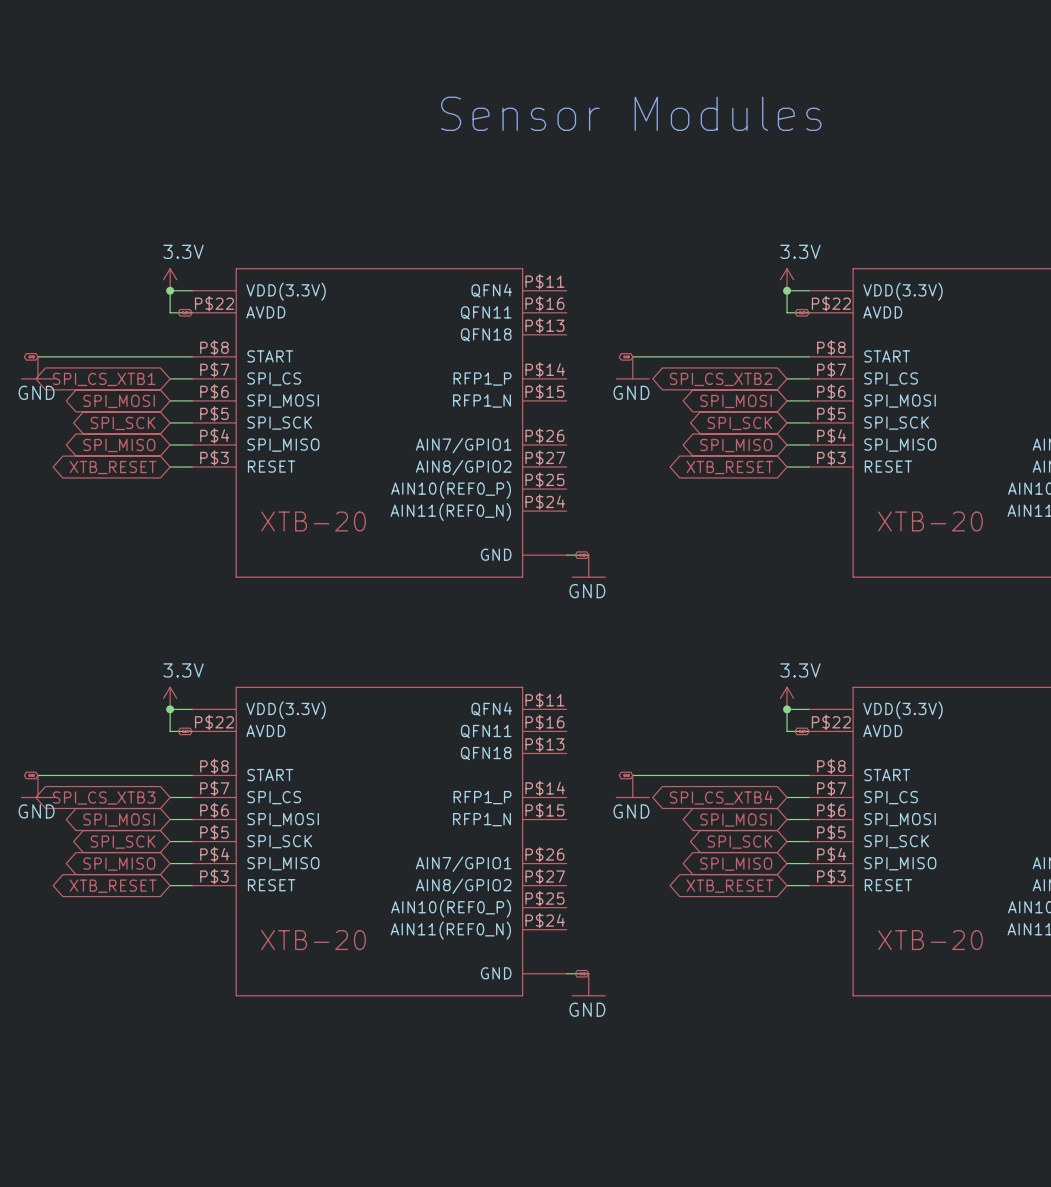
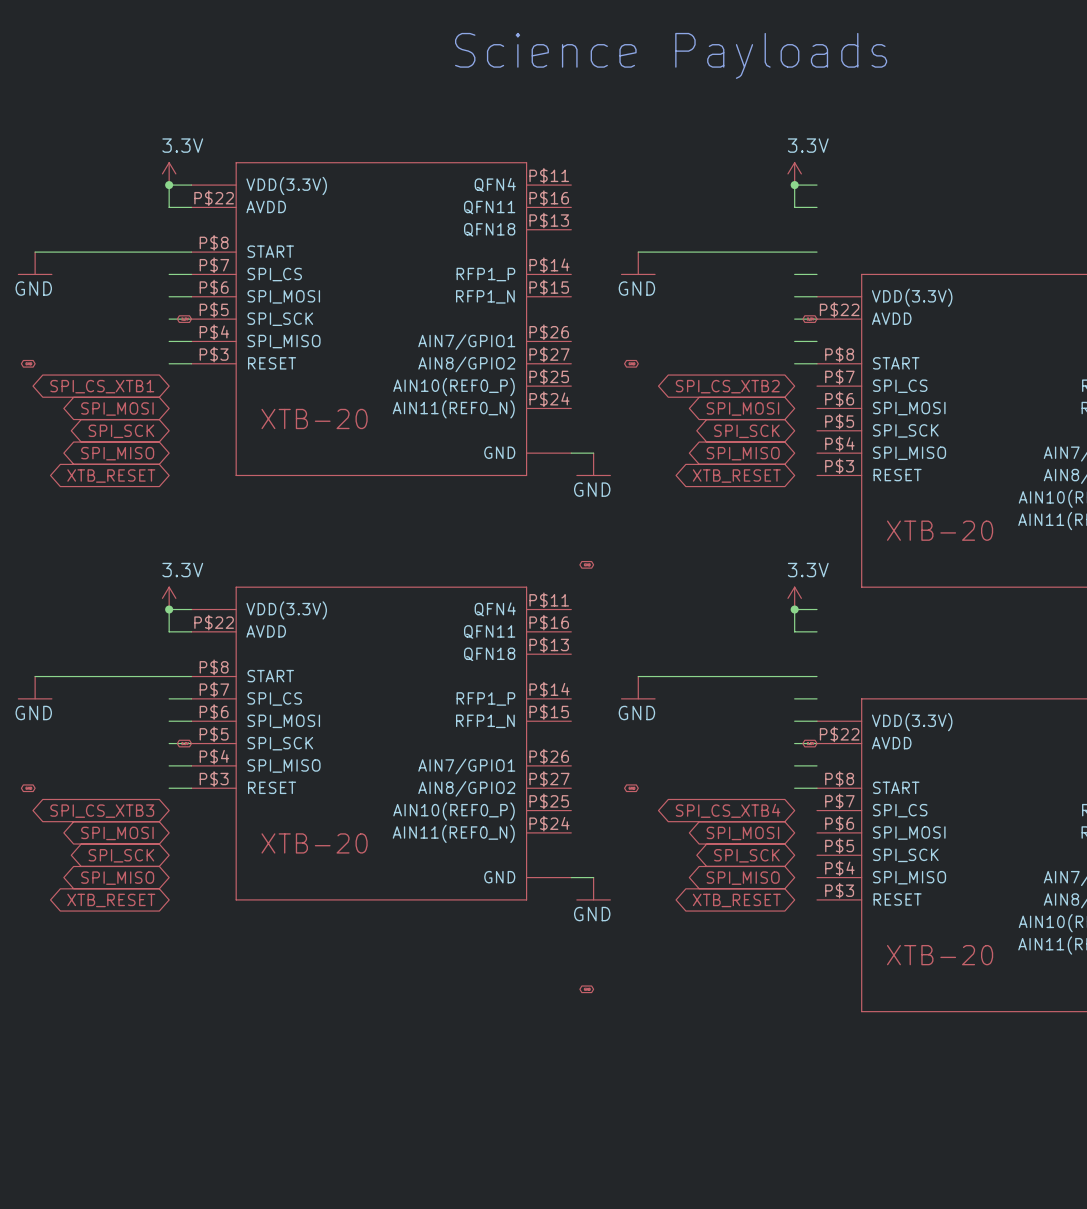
text: none -> Science Payloads (671, 55)
text: Sensor Modules (631, 113) -> none
junction: none -> (169, 185)
wire: none -> (191, 185) (169, 185) (169, 207) (191, 207)
junction: none -> (794, 185)
wire: none -> (817, 185) (794, 185) (794, 207) (817, 207)
wire: none -> (35, 252) (191, 252)
wire: none -> (638, 252) (817, 252)
power symbol: none -> GND (638, 263)
power symbol position: 3.3V (170, 279) -> 3.3V (169, 173)
power symbol position: 3.3V (787, 279) -> 3.3V (794, 173)
wire: (170, 290) (170, 312) -> none
junction: (170, 290) -> none
wire: (787, 290) (787, 312) -> none
junction: (787, 290) -> none
wire: (37, 356) (170, 356) -> none
wire: (632, 356) (787, 356) -> none
power symbol position: GND (37, 367) -> GND (35, 263)
power symbol: GND (632, 367) -> none
wire: (170, 378) (192, 378) -> (169, 274) (191, 274)
wire: (787, 378) (809, 378) -> (794, 274) (817, 274)
wire: (170, 400) (192, 400) -> none
wire: (787, 400) (809, 400) -> none
wire: (170, 422) (192, 422) -> none
part position: (379, 422) -> (381, 319)
wire: (787, 422) (809, 422) -> none
wire: (170, 444) (192, 444) -> (169, 341) (191, 341)
wire: (787, 444) (809, 444) -> (794, 341) (817, 341)
power symbol: none -> GND (593, 464)
wire: (170, 467) (192, 467) -> none
wire: (787, 467) (809, 467) -> none
wire: (566, 555) (588, 555) -> (571, 453) (593, 453)
power symbol: GND (588, 566) -> none
junction: none -> (169, 609)
wire: none -> (191, 609) (169, 609) (169, 631) (191, 631)
junction: none -> (794, 609)
wire: none -> (817, 609) (794, 609) (794, 631) (817, 631)
wire: none -> (35, 676) (191, 676)
wire: none -> (638, 676) (817, 676)
power symbol: none -> GND (638, 687)
power symbol position: 3.3V (170, 698) -> 3.3V (169, 598)
power symbol position: 3.3V (787, 698) -> 3.3V (794, 598)
wire: (170, 709) (170, 731) -> none
junction: (170, 709) -> none
wire: (787, 709) (787, 731) -> none
junction: (787, 709) -> none
wire: (37, 775) (170, 775) -> none
wire: (632, 775) (787, 775) -> none
power symbol position: GND (37, 786) -> GND (35, 687)
power symbol: GND (632, 786) -> none
wire: (170, 797) (192, 797) -> (169, 698) (191, 698)
wire: (787, 797) (809, 797) -> (794, 698) (817, 698)
wire: (170, 819) (192, 819) -> none
wire: (787, 819) (809, 819) -> none
wire: (170, 841) (192, 841) -> none
part position: (379, 841) -> (381, 743)
wire: (787, 841) (809, 841) -> none
wire: (170, 863) (192, 863) -> (169, 765) (191, 765)
wire: (787, 863) (809, 863) -> (794, 765) (817, 765)
power symbol: none -> GND (593, 888)
wire: (170, 885) (192, 885) -> none
wire: (787, 885) (809, 885) -> none
wire: (566, 973) (588, 973) -> (571, 877) (593, 877)
power symbol: GND (588, 984) -> none

